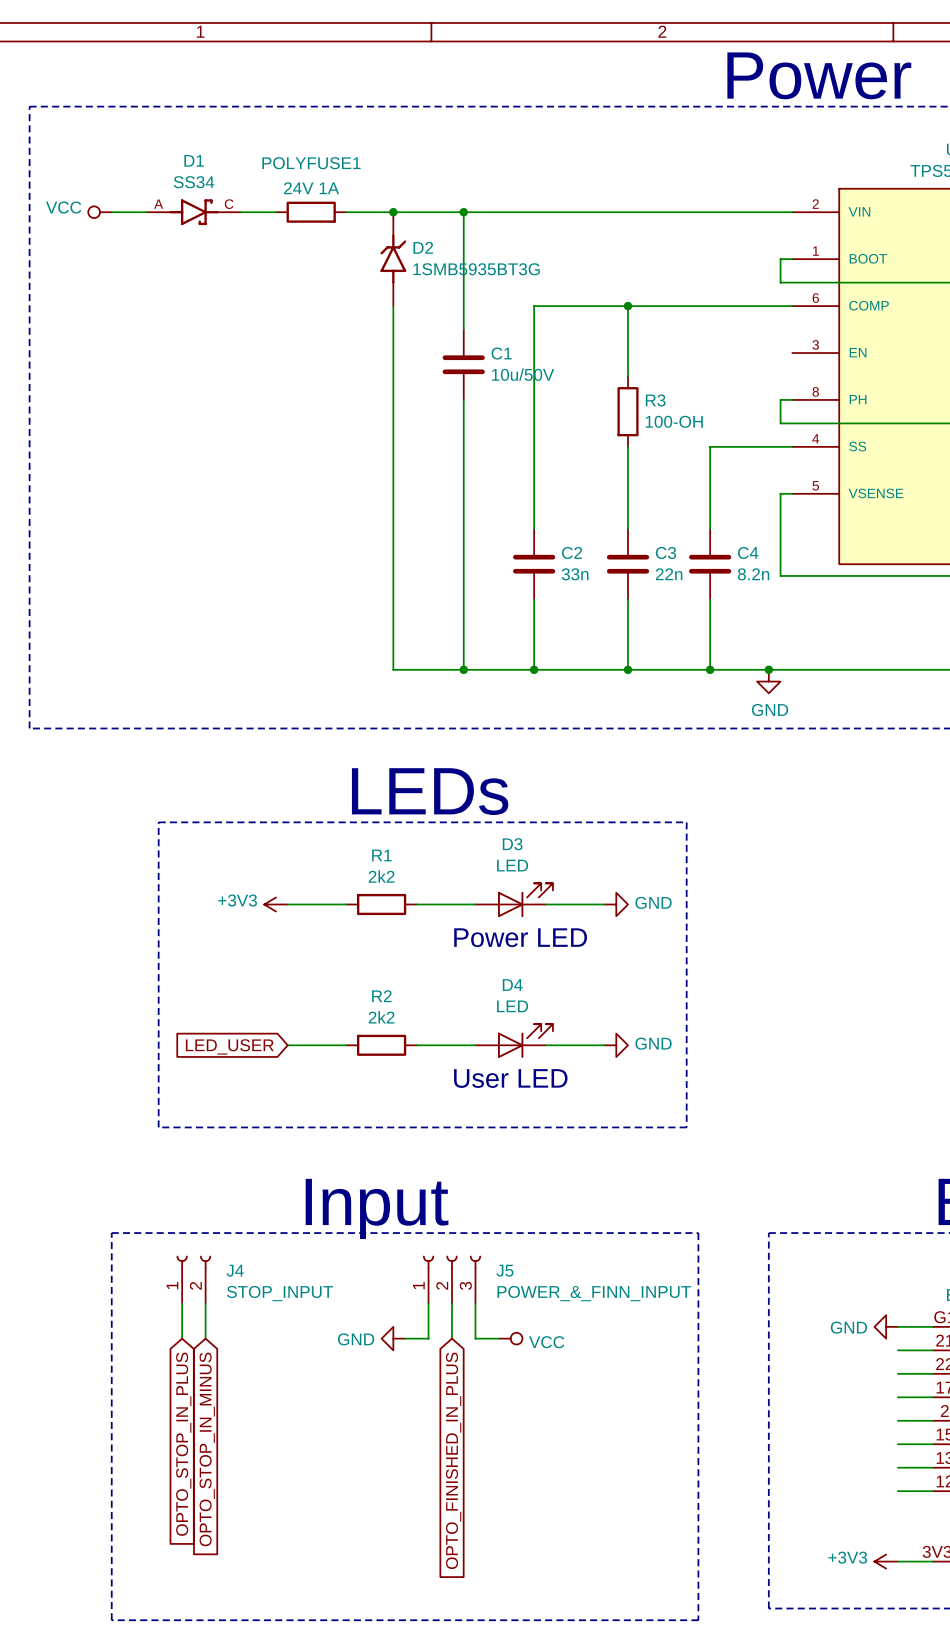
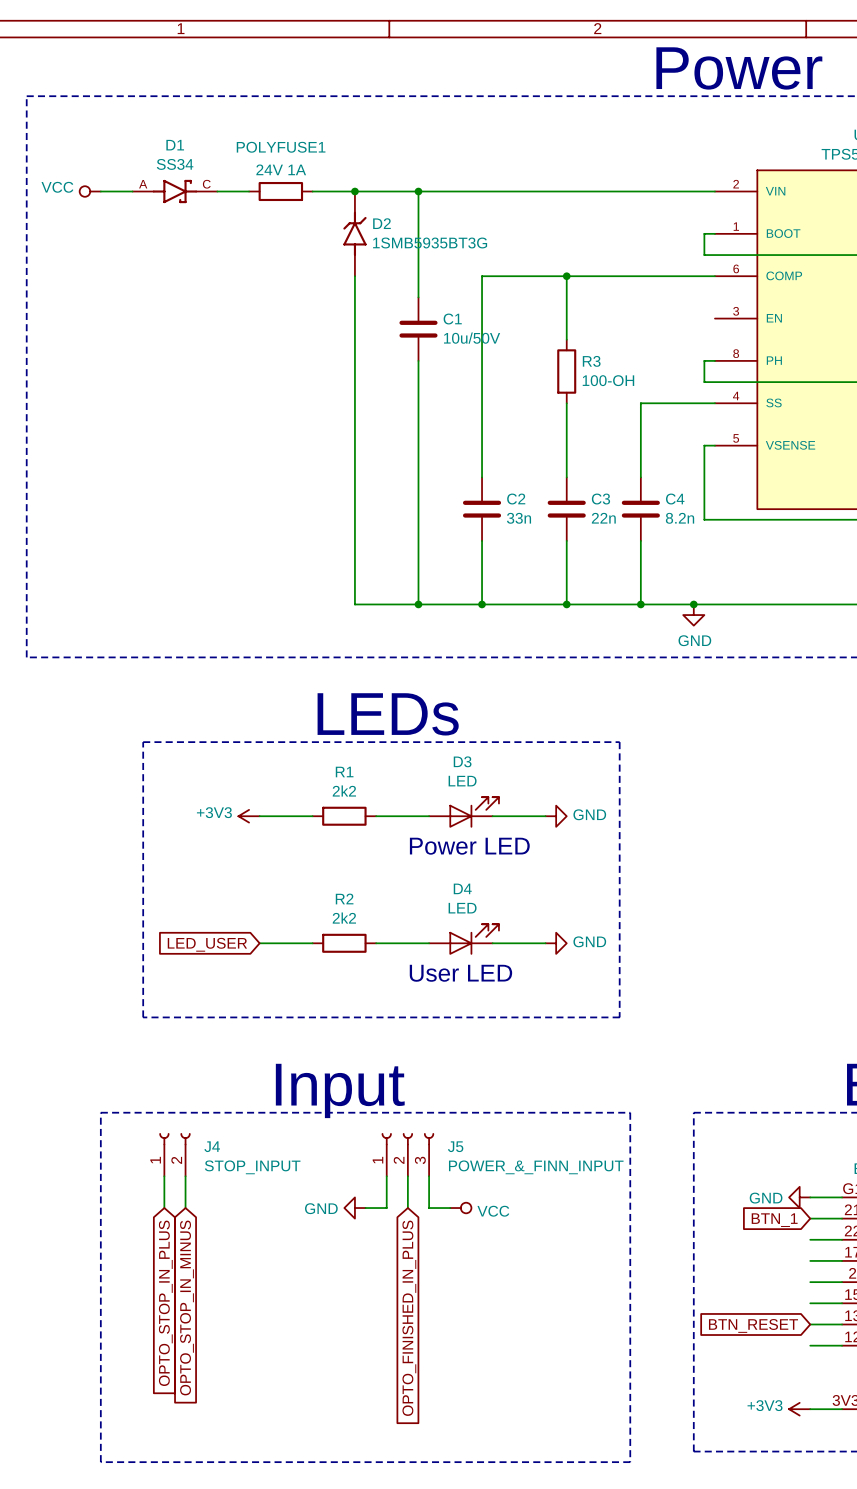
global label: none -> BTN_1 (774, 1220)
global label: none -> BTN_RESET (753, 1325)

